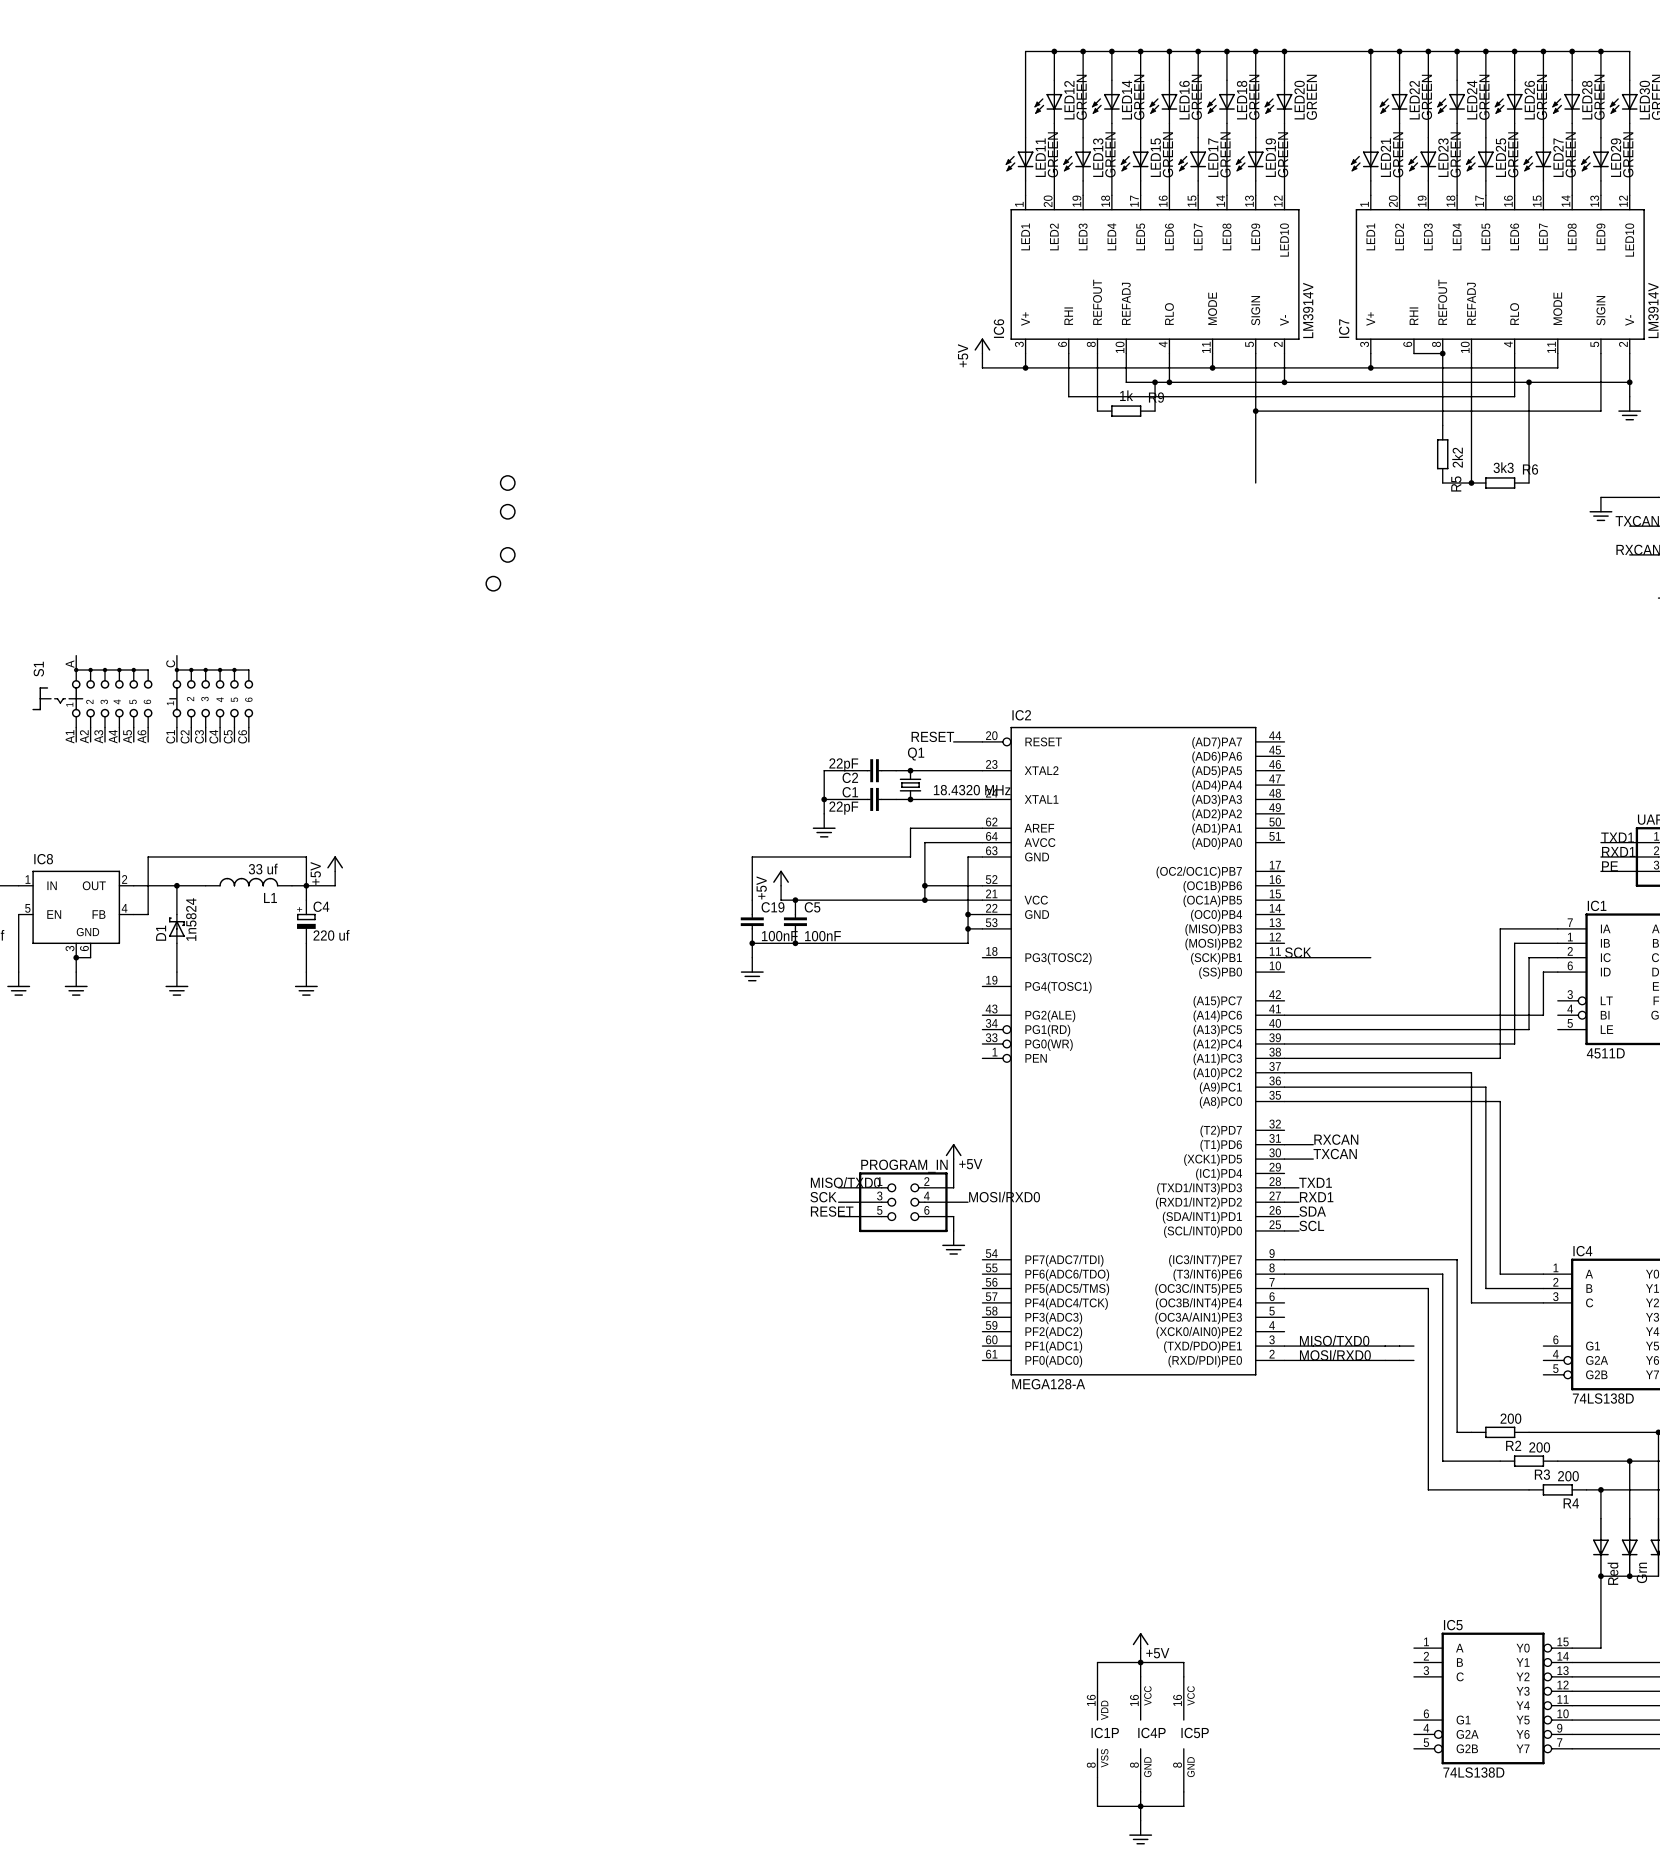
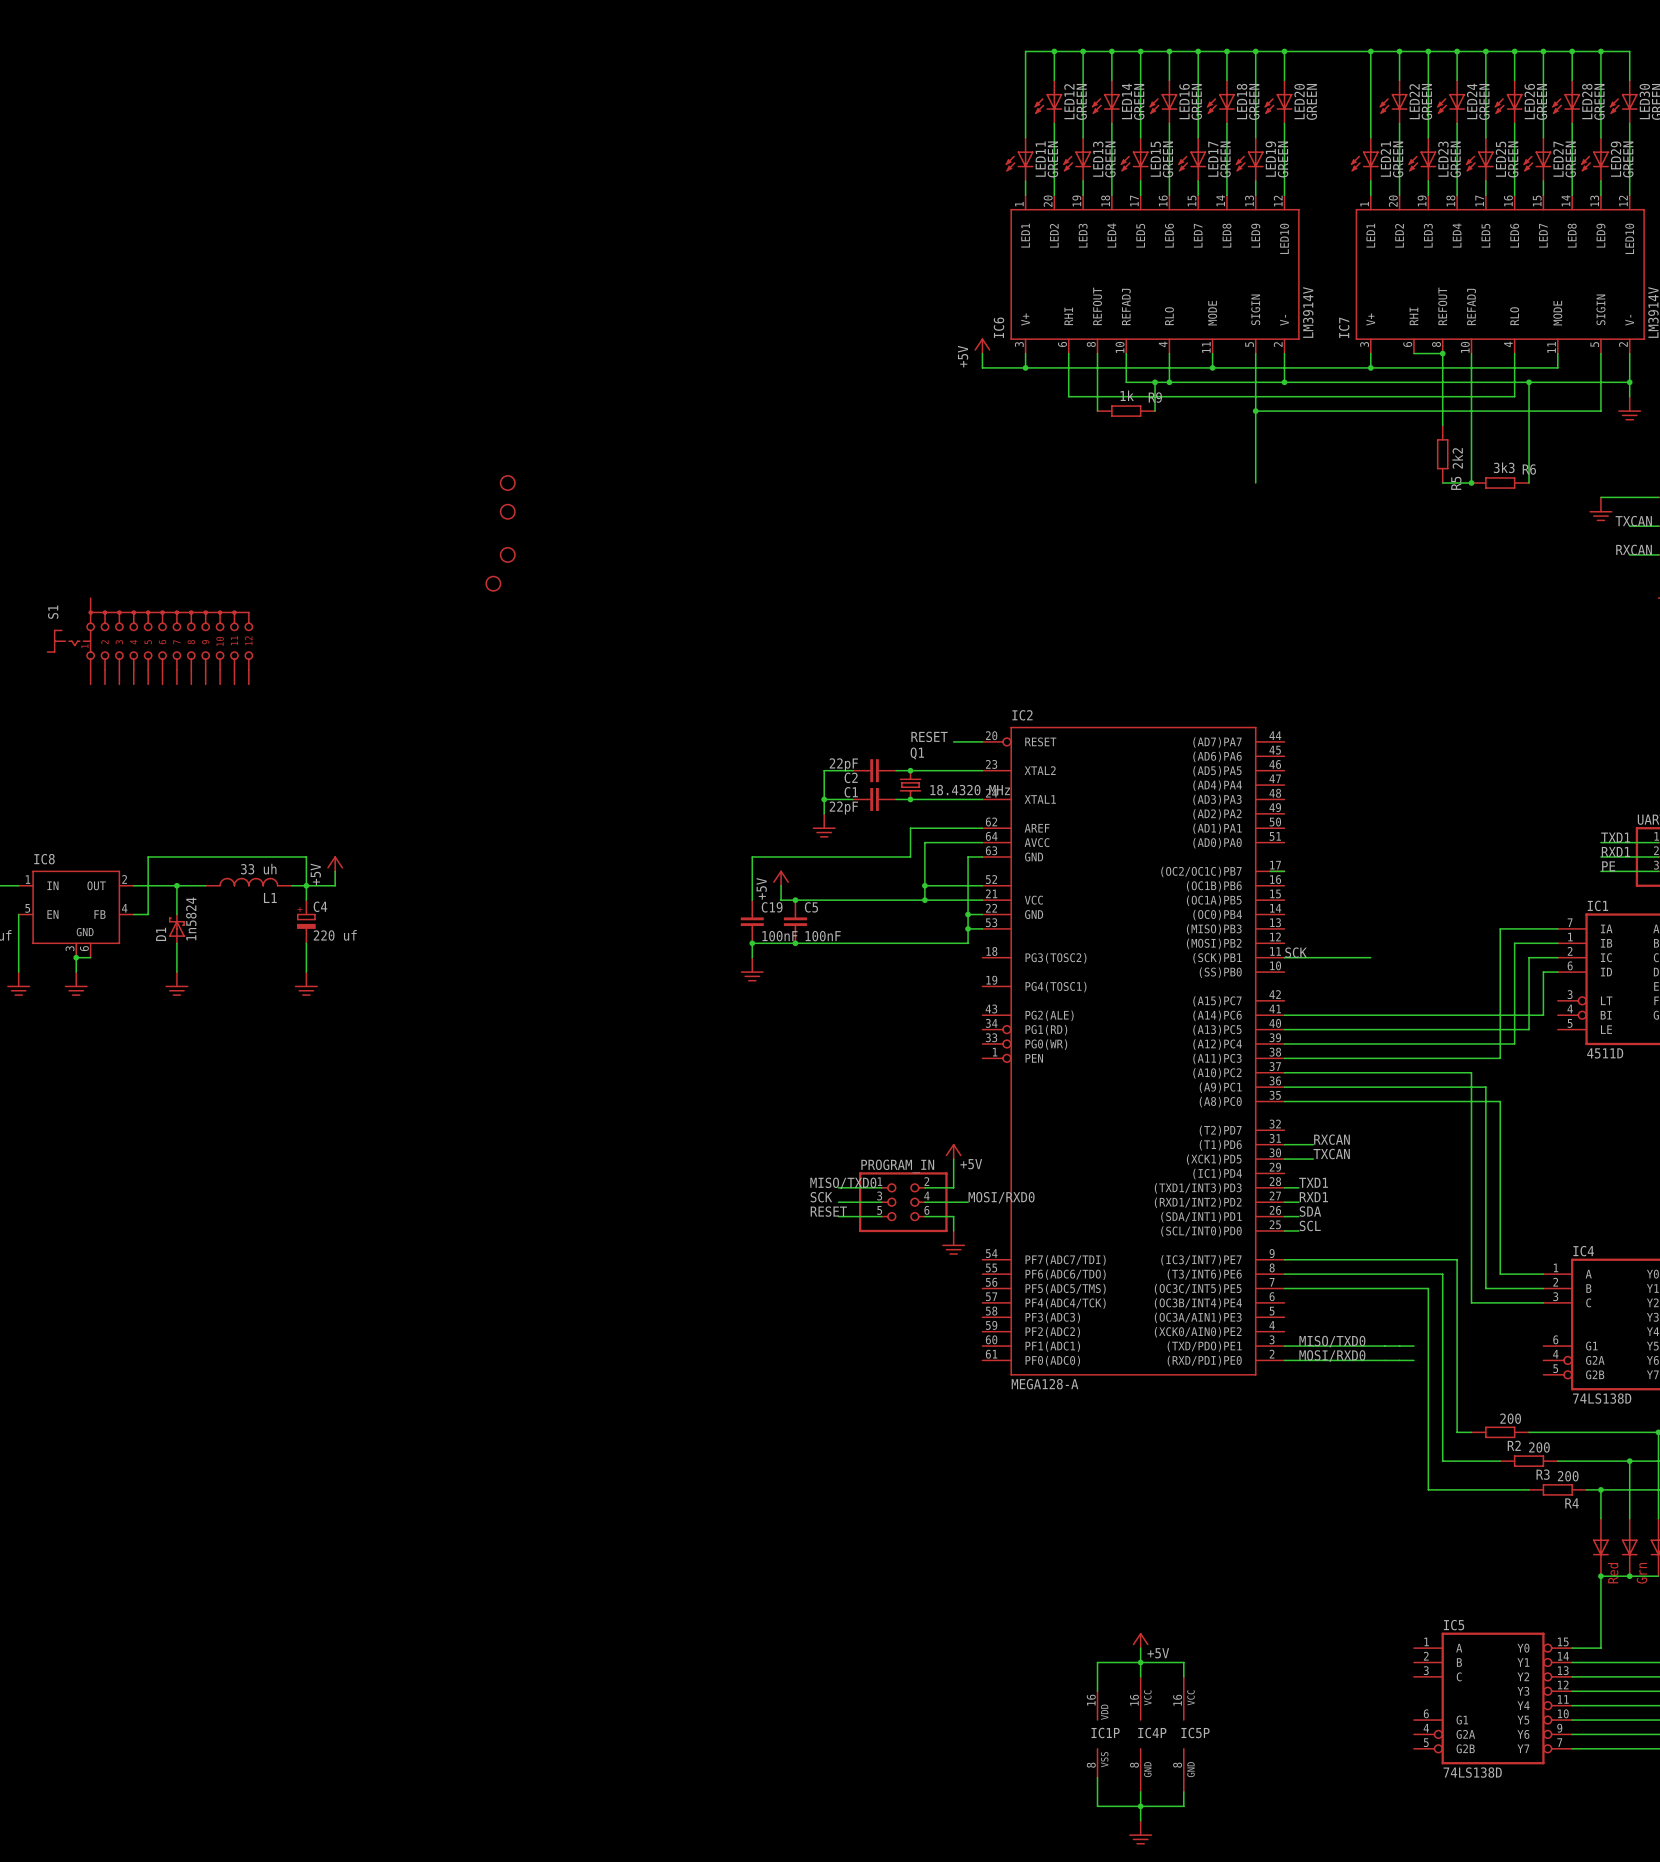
S1 symbol: [32, 655, 254, 742] -> [46, 598, 254, 685]
L1 value: 33 uf (263, 869) -> 33 uh (258, 869)

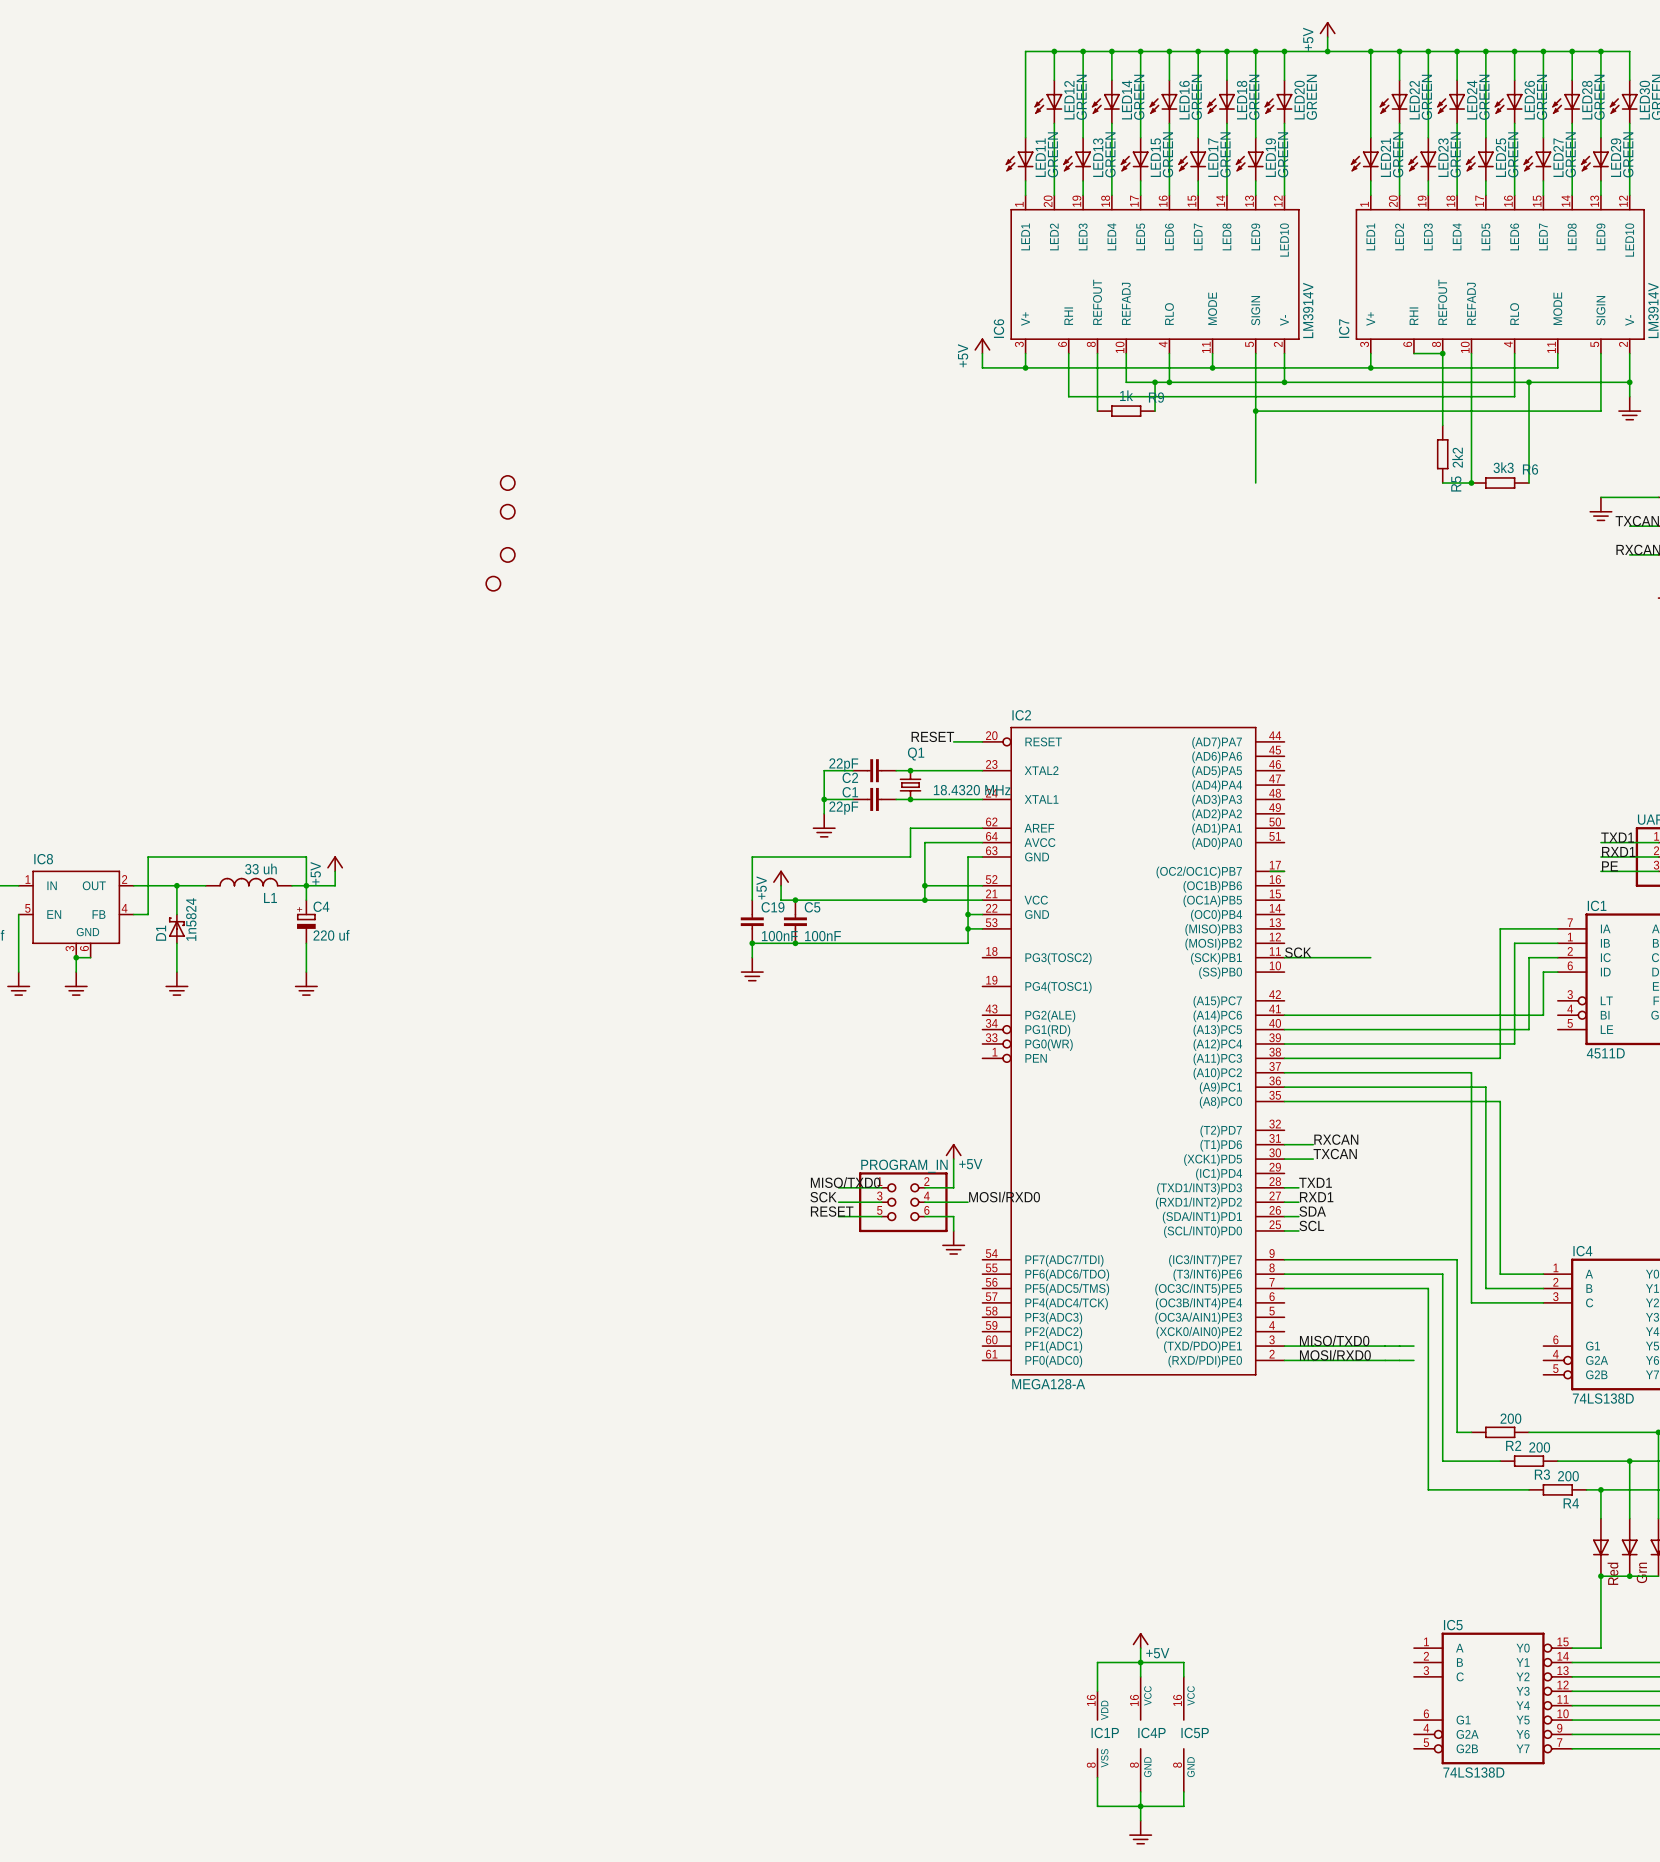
power symbol: none -> +5V (1327, 29)
wire: none -> (1327, 37) (1327, 51)
junction: none -> (1327, 51)
S1: (149, 641) -> none

